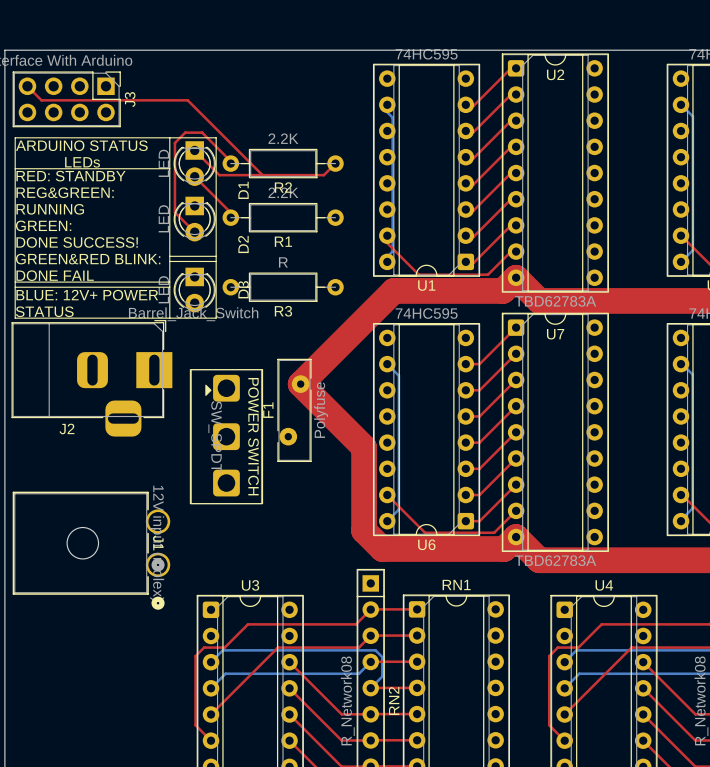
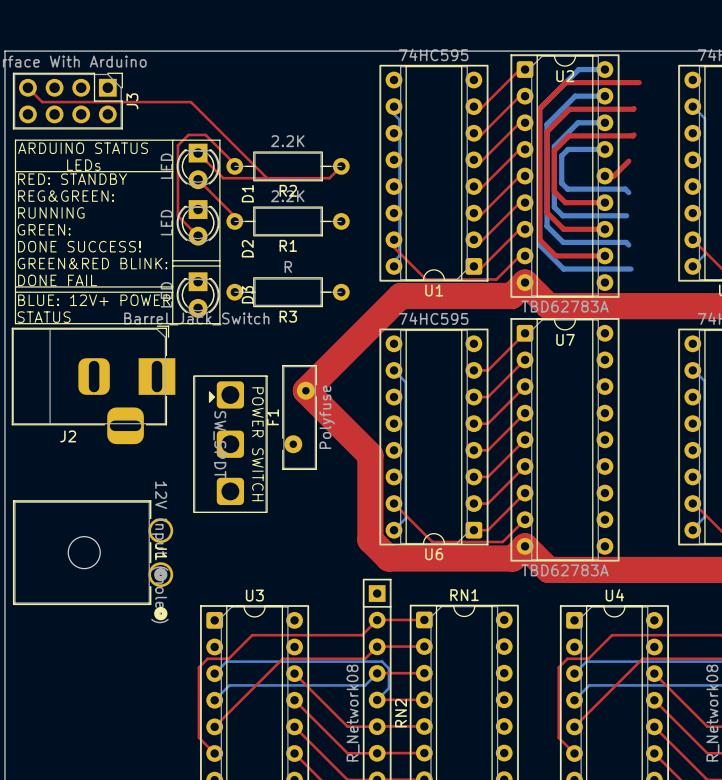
bottom track: none -> (604, 69) (578, 69) (539, 108) (539, 245) (563, 269) (630, 269)
top track: none -> (639, 82) (565, 82) (539, 108) (539, 239) (555, 255) (604, 255)
bottom track: none -> (604, 96) (575, 96) (547, 124) (547, 226) (563, 242) (626, 242) (628, 245)
top track: none -> (634, 108) (569, 109) (547, 131) (547, 212) (563, 229) (604, 229)
bottom track: none -> (604, 122) (578, 122) (554, 146) (554, 207) (562, 215) (626, 215)
top track: none -> (634, 134) (569, 135) (554, 150) (554, 191) (565, 202) (604, 202)
bottom track: none -> (604, 149) (568, 149) (561, 155) (561, 183) (567, 189) (625, 189) (628, 192)
top track: none -> (628, 161) (613, 176) (604, 176)

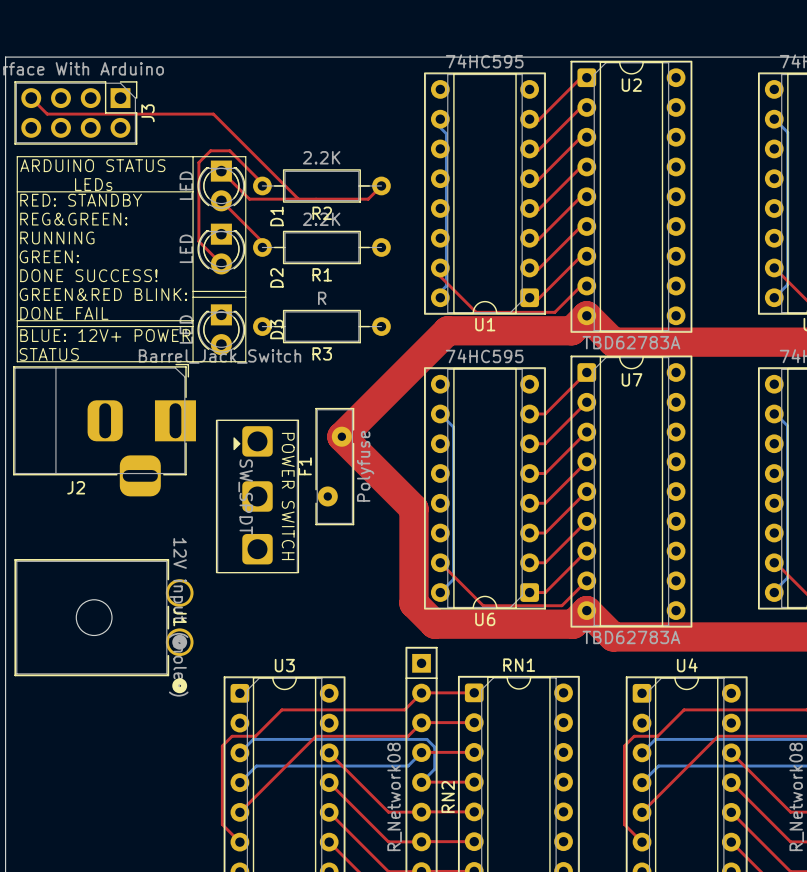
bottom track: (604, 69) (578, 69) (539, 108) (539, 245) (563, 269) (630, 269) -> none
top track: (639, 82) (565, 82) (539, 108) (539, 239) (555, 255) (604, 255) -> none
bottom track: (604, 96) (575, 96) (547, 124) (547, 226) (563, 242) (626, 242) (628, 245) -> none
top track: (634, 108) (569, 109) (547, 131) (547, 212) (563, 229) (604, 229) -> none
bottom track: (604, 122) (578, 122) (554, 146) (554, 207) (562, 215) (626, 215) -> none
top track: (634, 134) (569, 135) (554, 150) (554, 191) (565, 202) (604, 202) -> none
bottom track: (604, 149) (568, 149) (561, 155) (561, 183) (567, 189) (625, 189) (628, 192) -> none
top track: (628, 161) (613, 176) (604, 176) -> none

